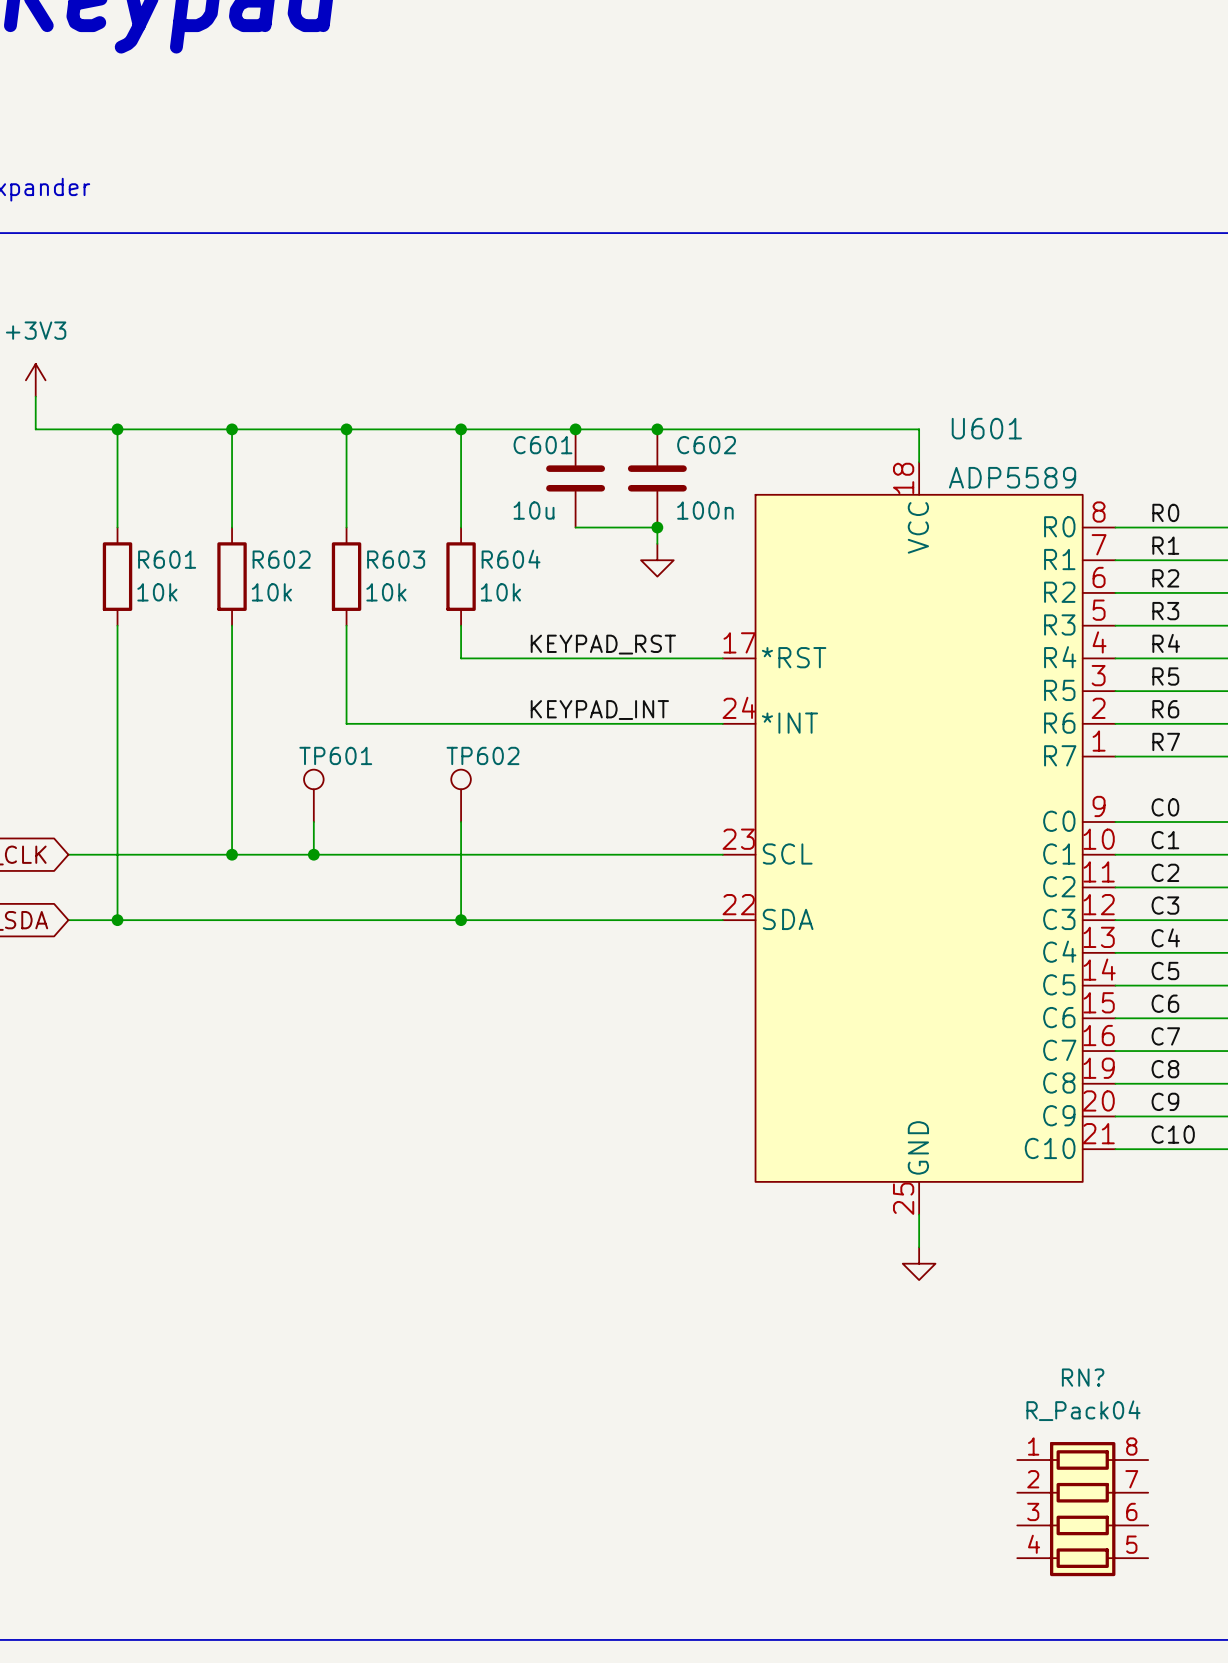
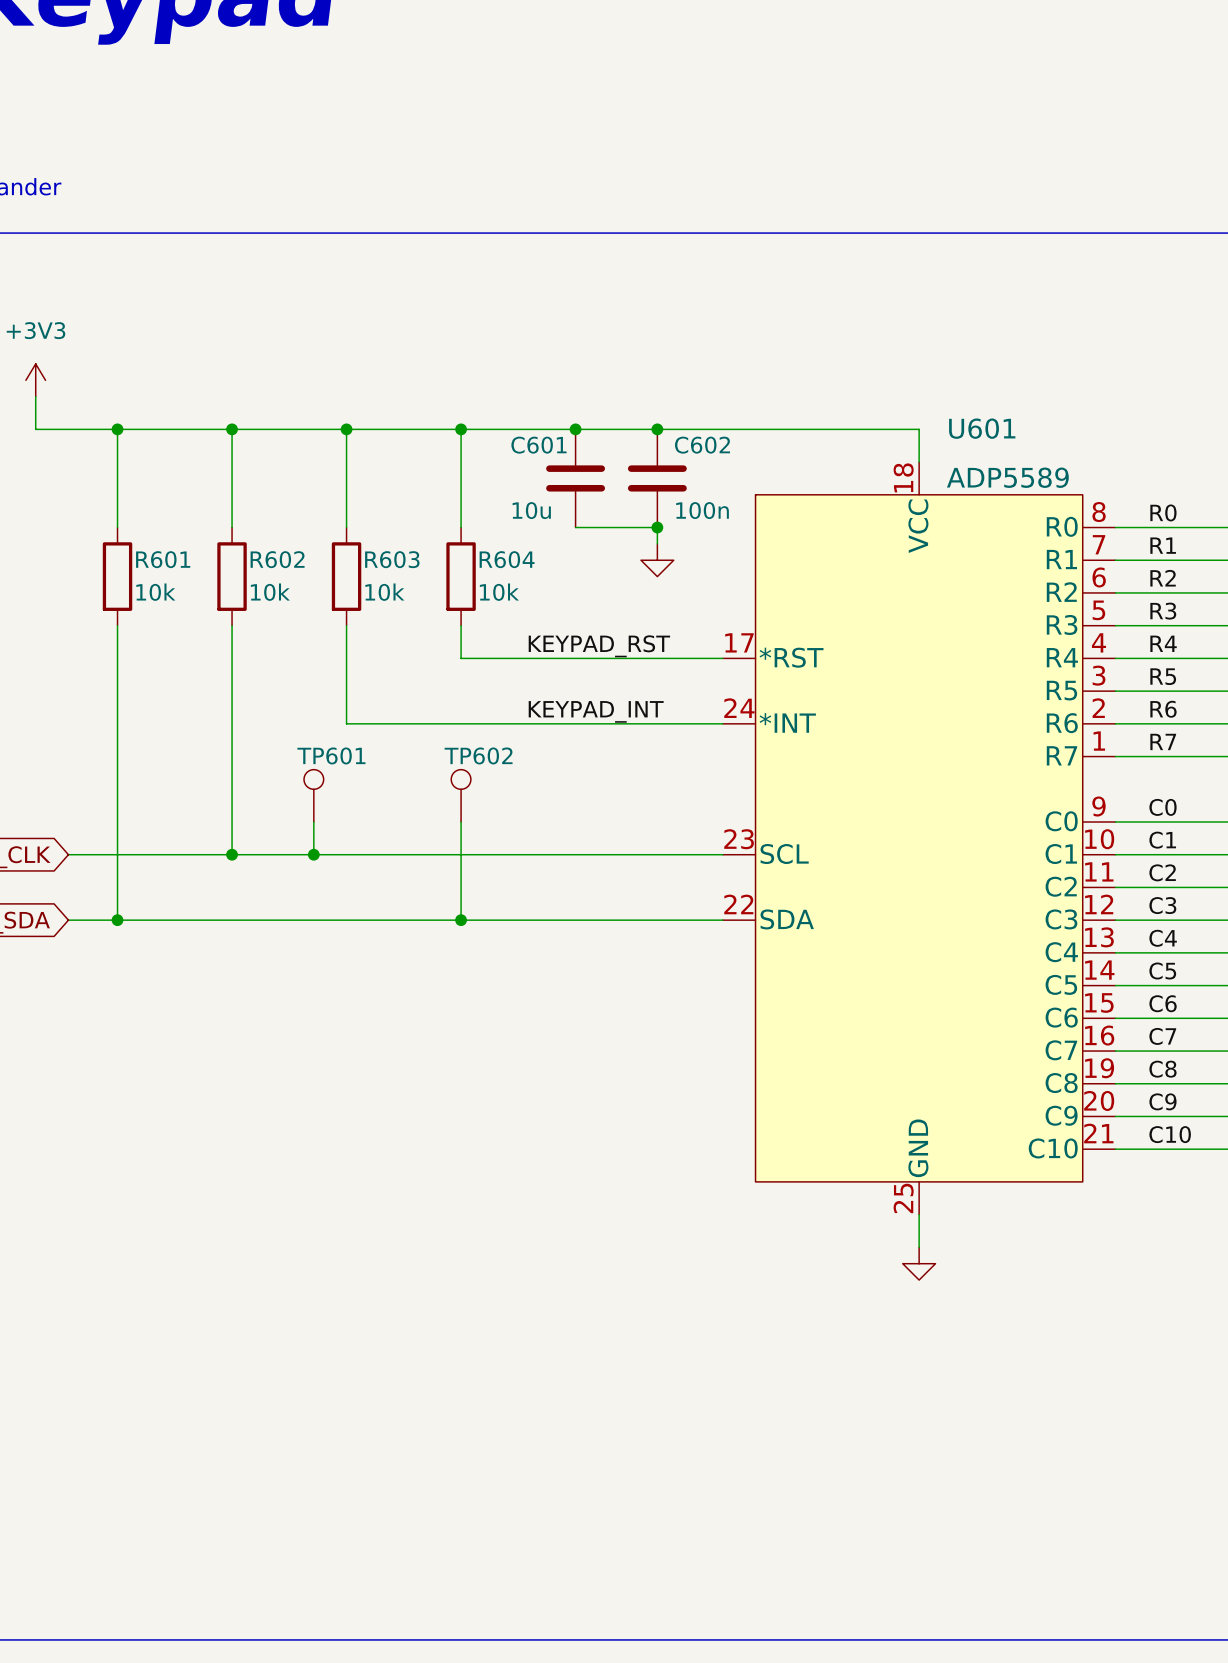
RN?: R_Pack04 (1082, 1509) -> none

